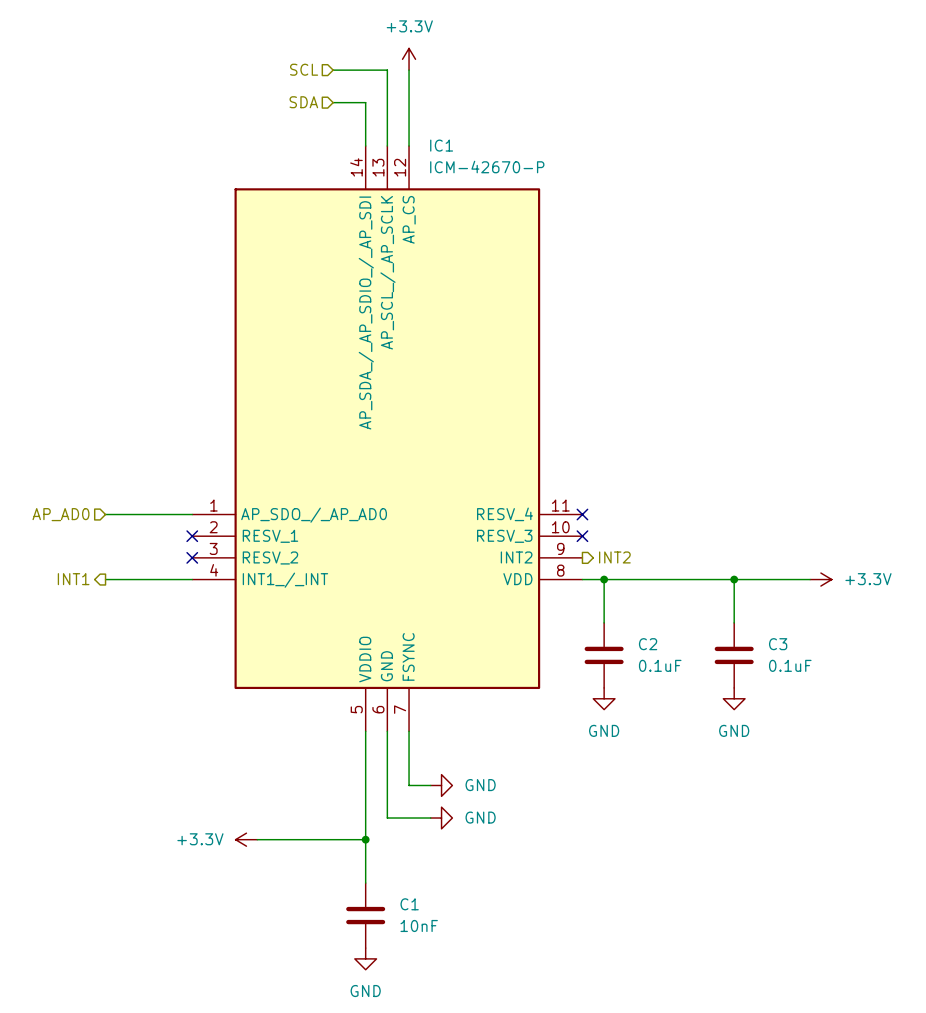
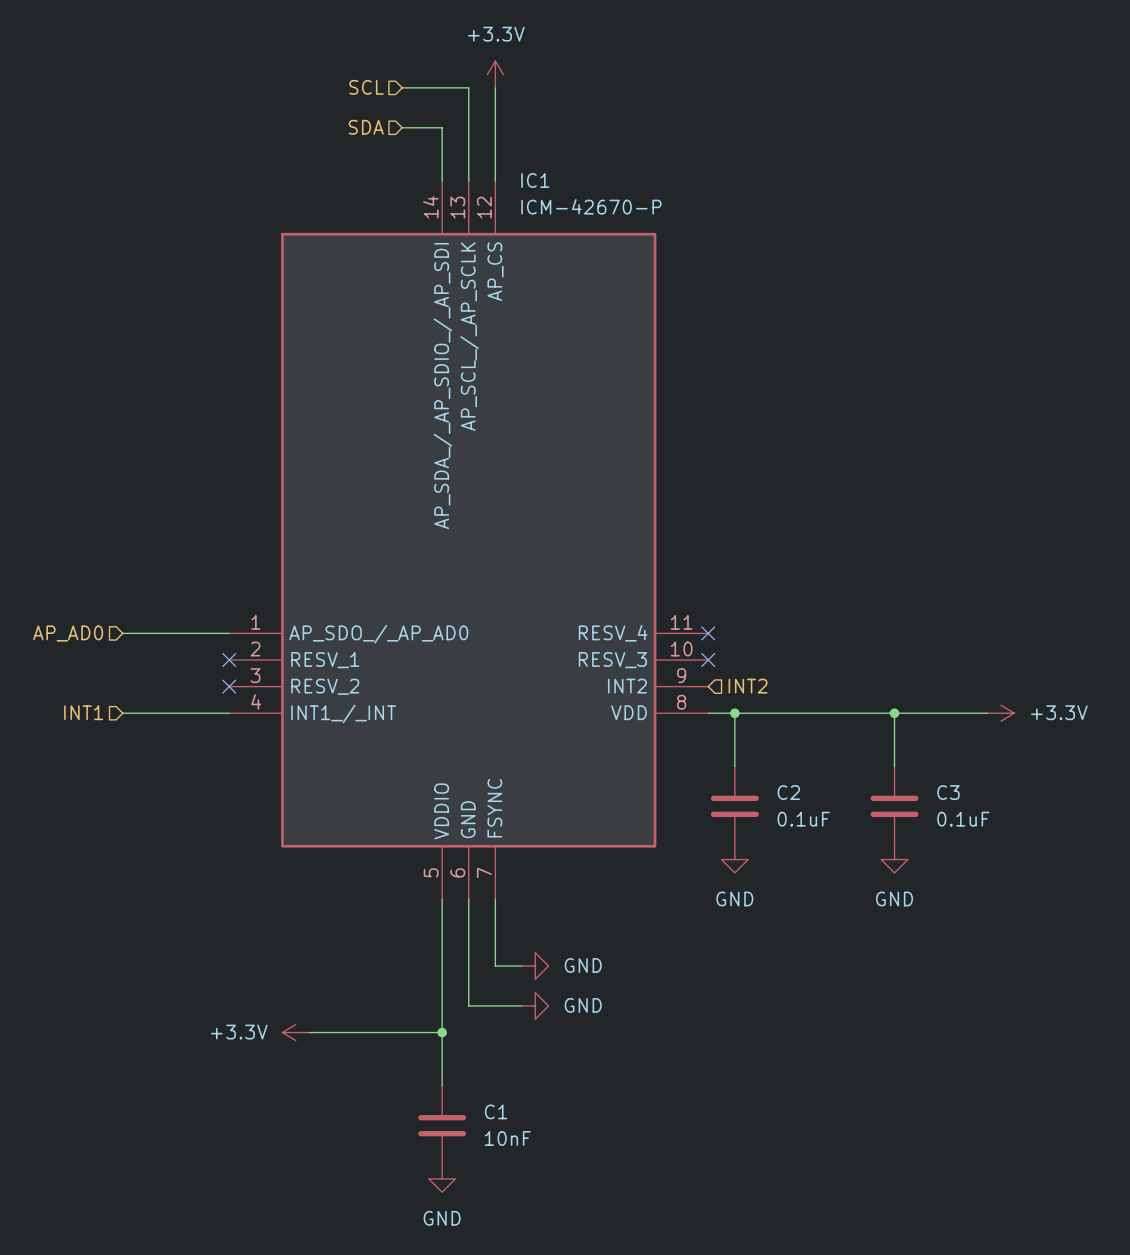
hierarchical label shape: output (614, 557) -> input (748, 686)
hierarchical label shape: output (73, 579) -> input (83, 712)

